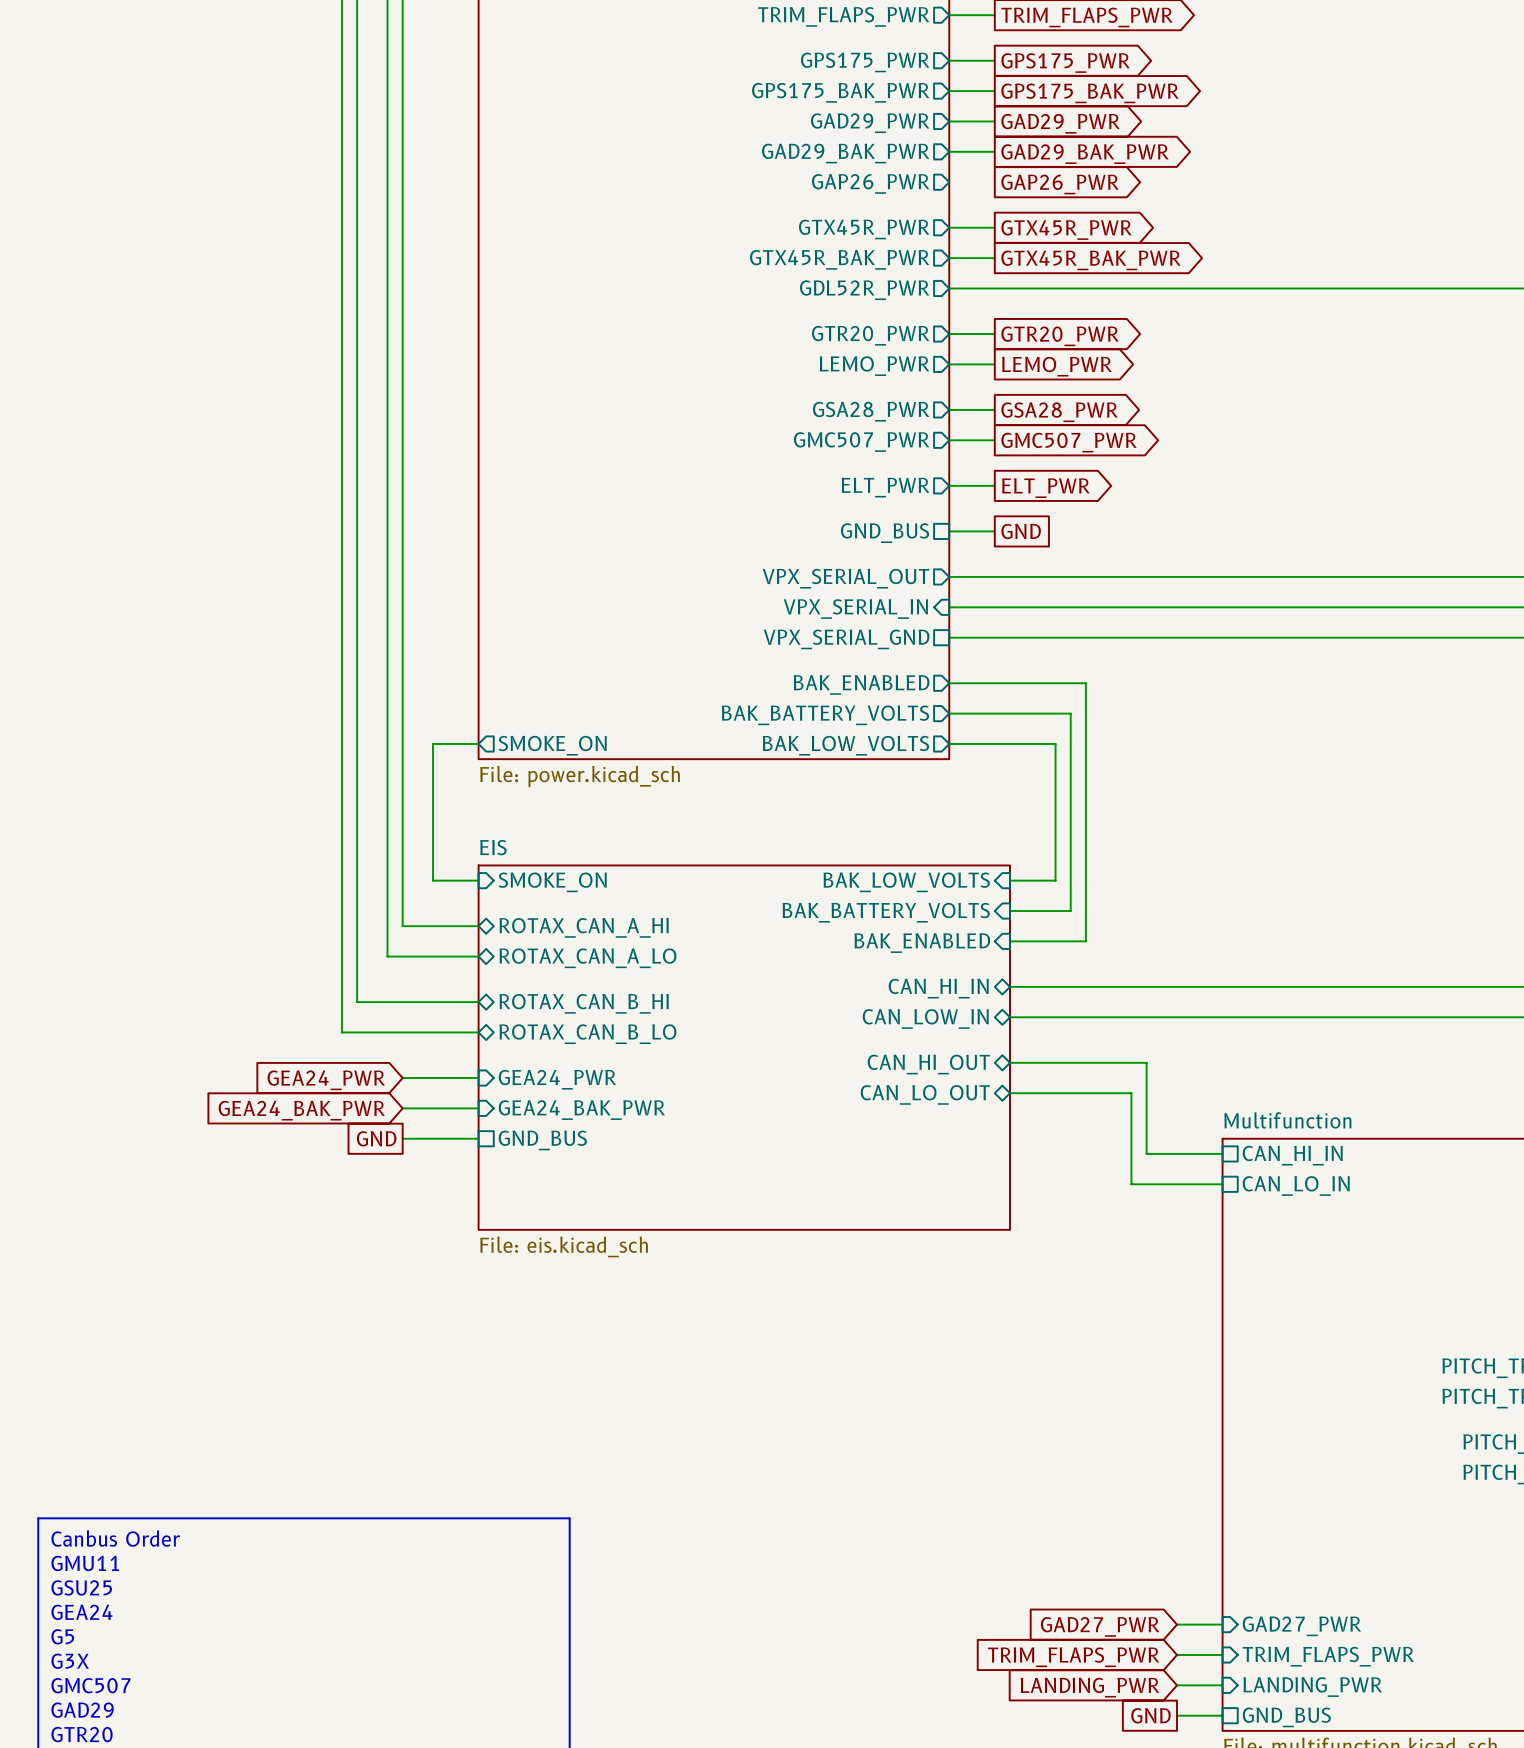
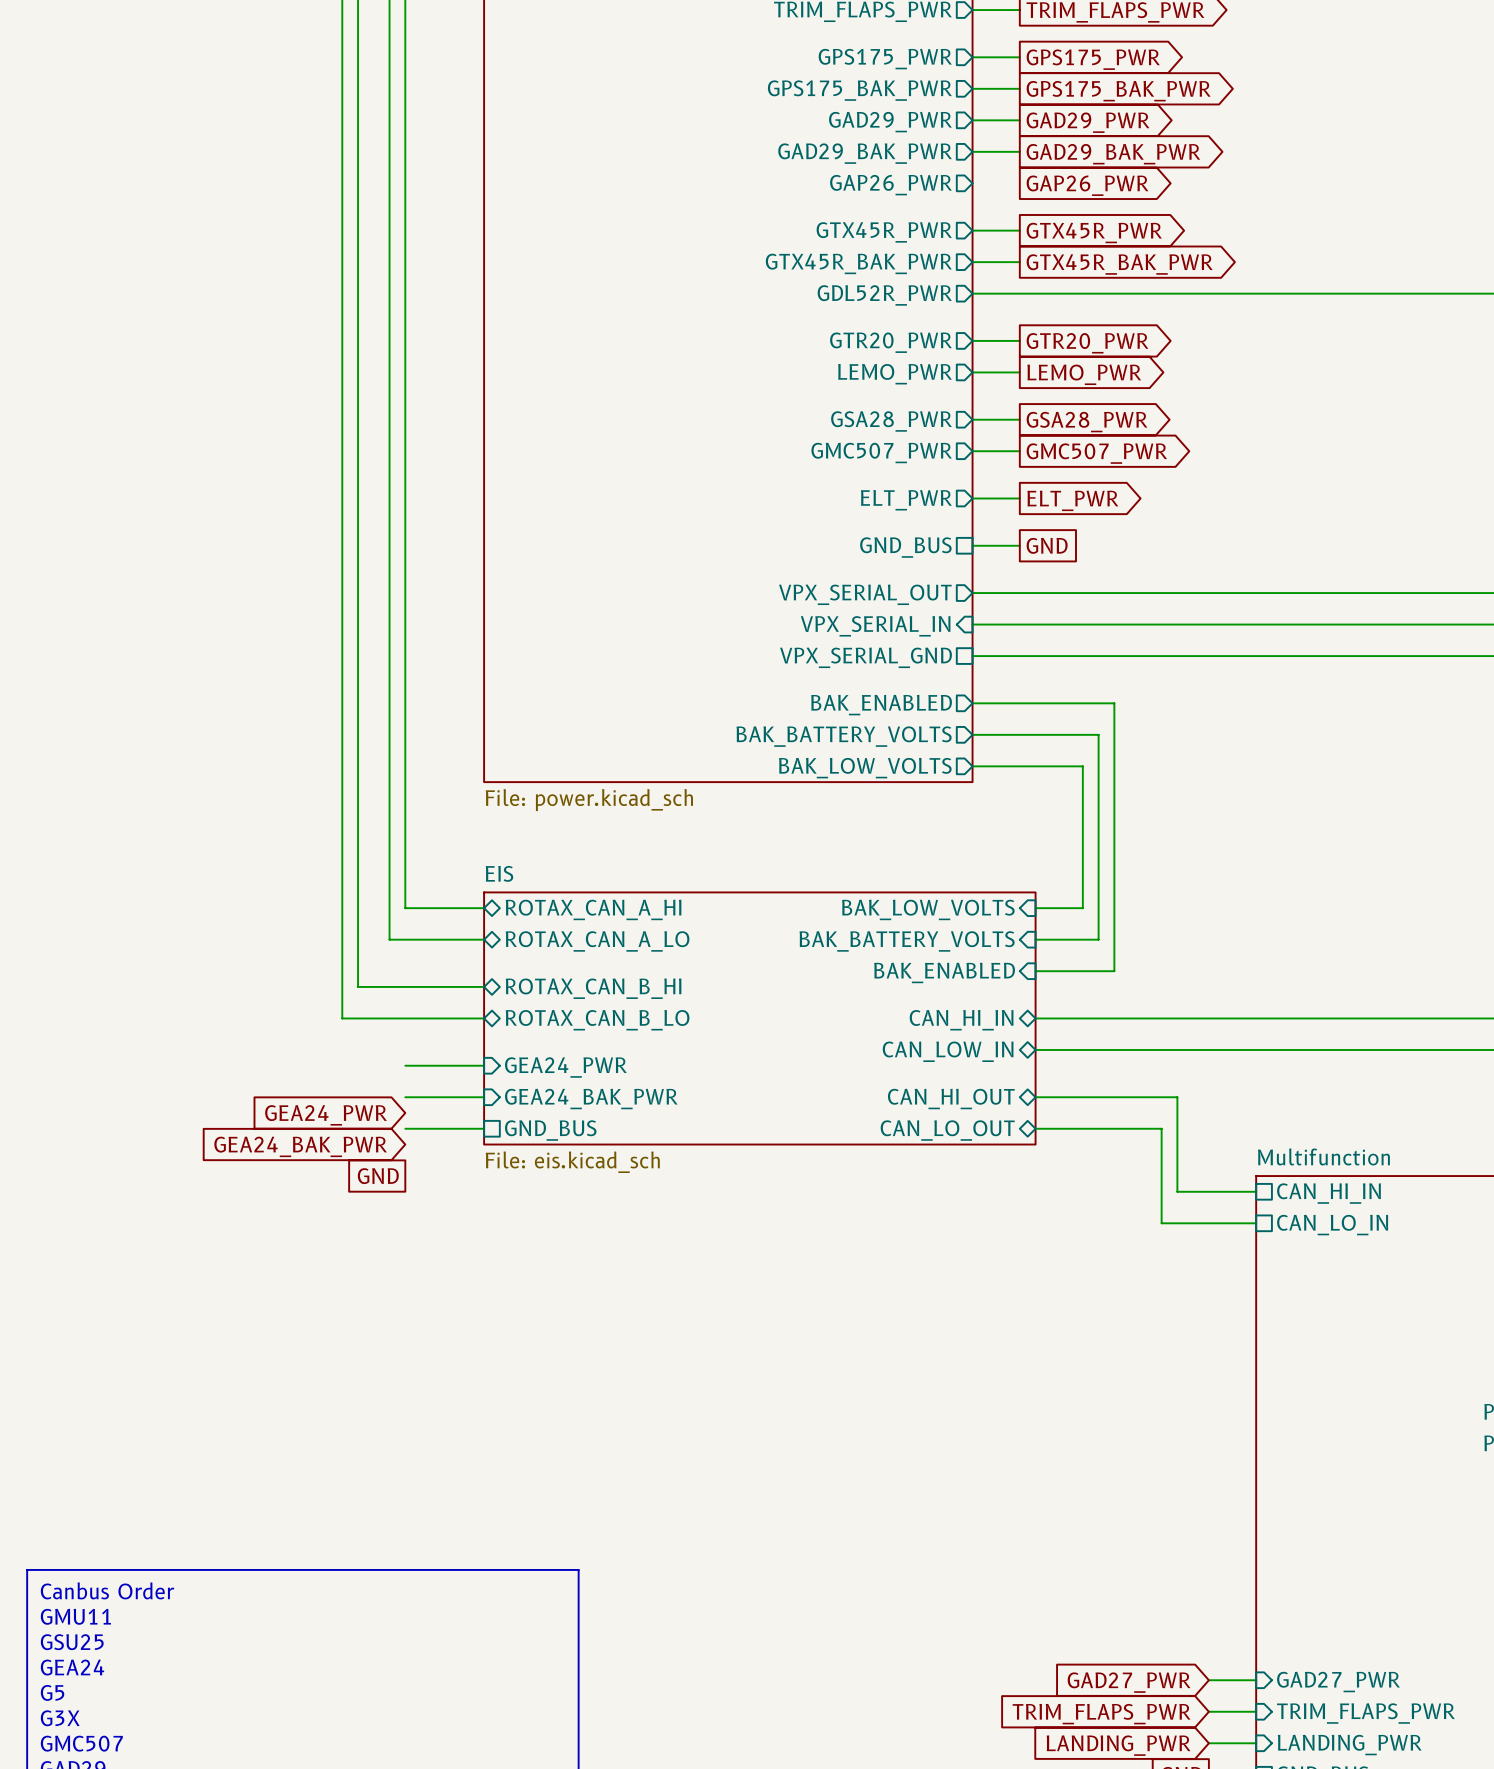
wire: (478, 743) (433, 743) (433, 880) -> none
sheet pin: SMOKE_ON (552, 745) -> none
wire: (402, 880) (402, 926) (478, 926) -> (405, 908) (436, 908)
sheet pin shape: input (552, 882) -> bidirectional (593, 909)
sheet pin: SMOKE_ON (552, 882) -> ROTAX_CAN_A_HI (593, 909)
wire: (387, 911) (387, 956) -> (358, 986) (389, 986)
wire: none -> (389, 939) (484, 939)
sheet pin: ROTAX_CAN_A_HI (584, 927) -> ROTAX_CAN_A_LO (597, 941)
wire: (357, 956) (357, 1002) (478, 1002) -> none
sheet pin: ROTAX_CAN_A_LO (587, 958) -> ROTAX_CAN_B_HI (593, 988)
wire: (341, 986) (341, 1032) (402, 1032) -> (342, 1018) (484, 1018)
sheet EIS: none -> File: eis.kicad_sch (759, 1018)
sheet pin: ROTAX_CAN_B_HI (584, 1003) -> ROTAX_CAN_B_LO (597, 1020)
sheet pin shape: bidirectional (587, 1034) -> input (565, 1067)
sheet pin: ROTAX_CAN_B_LO (587, 1034) -> GEA24_PWR (565, 1067)
sheet EIS: File: eis.kicad_sch (744, 1047) -> none
wire: (402, 1078) (478, 1078) -> (405, 1097) (484, 1097)
sheet pin: GEA24_PWR (557, 1079) -> none
wire: (402, 1108) (478, 1108) -> (405, 1128) (484, 1128)
sheet pin position: GEA24_BAK_PWR (581, 1110) -> GEA24_BAK_PWR (591, 1099)
wire: (402, 1138) (478, 1138) -> none
sheet pin position: GND_BUS (542, 1140) -> GND_BUS (550, 1130)

